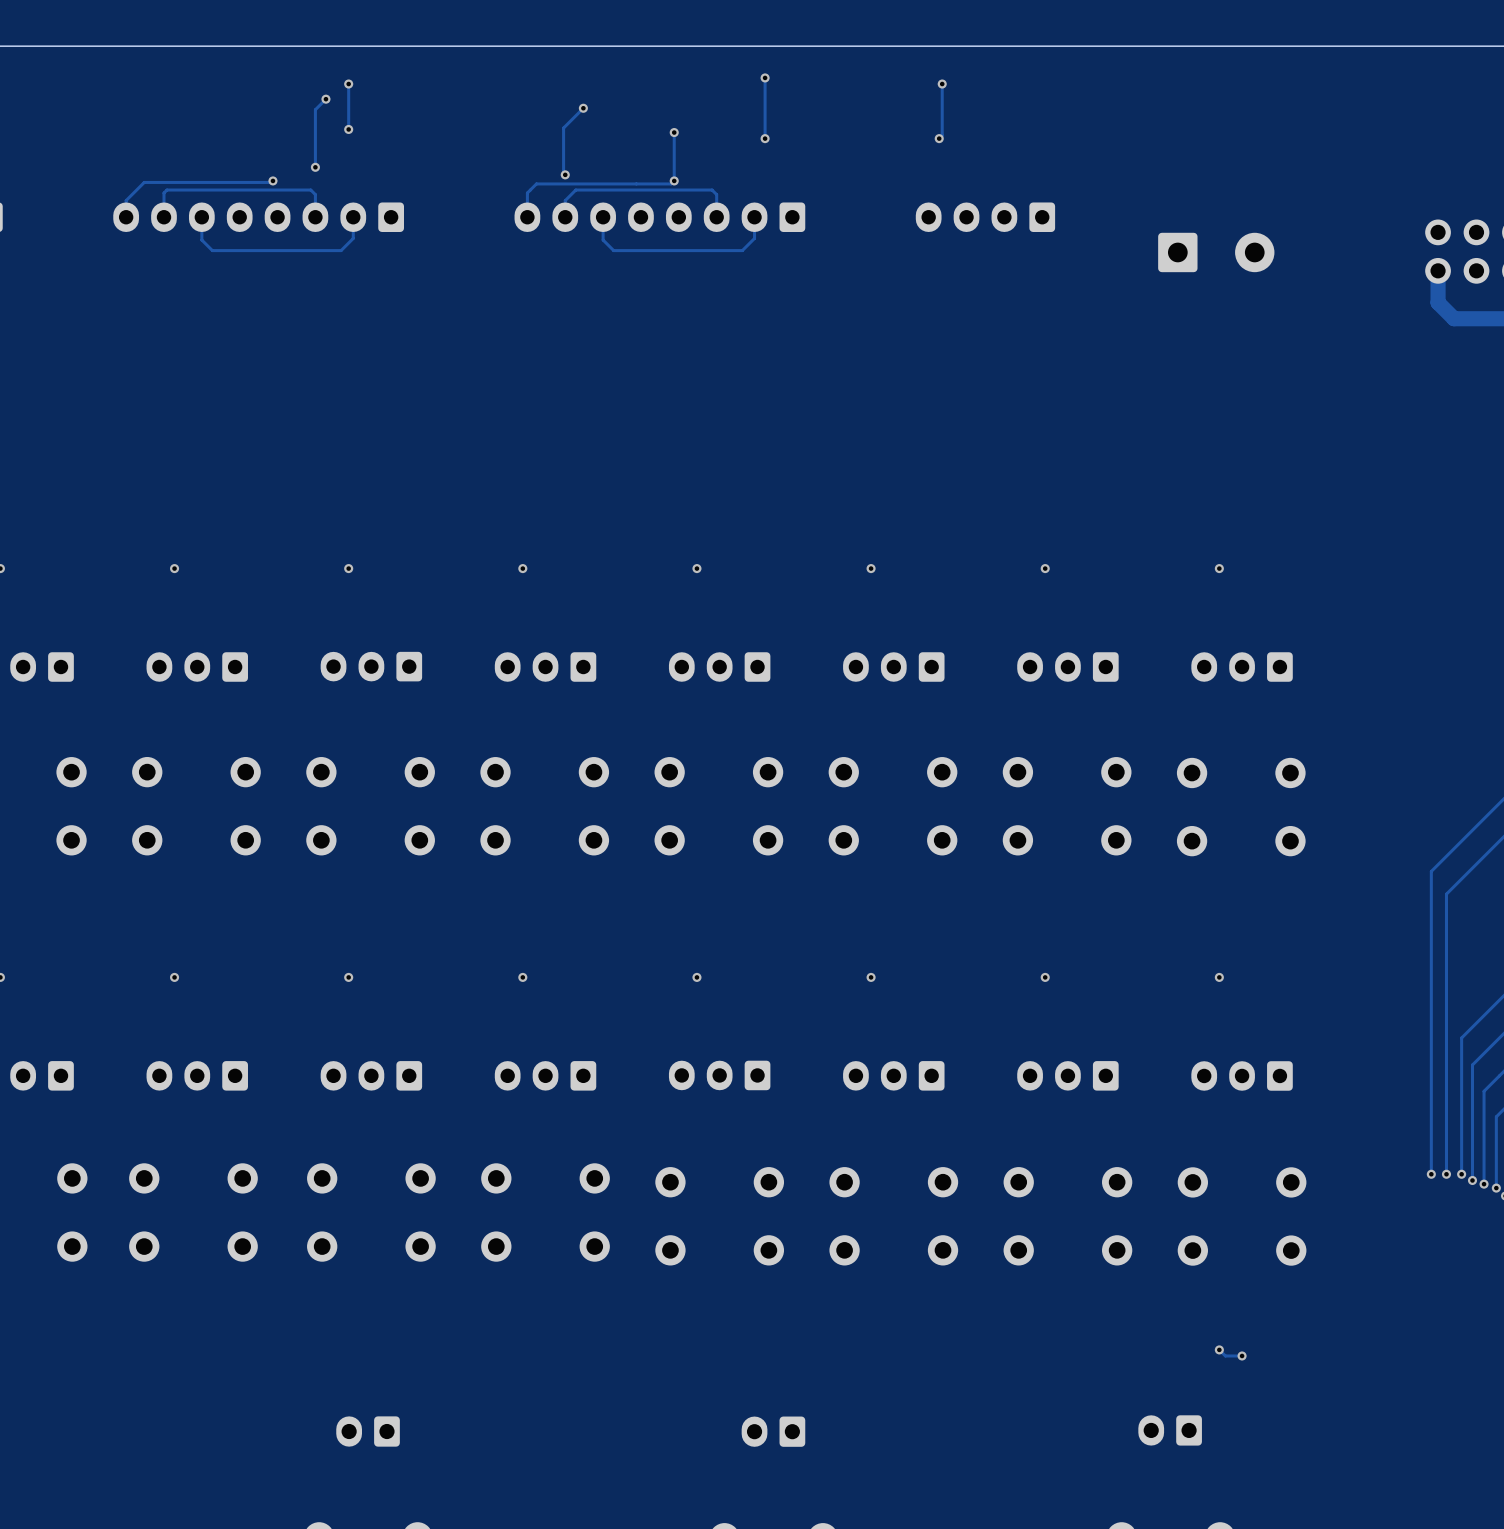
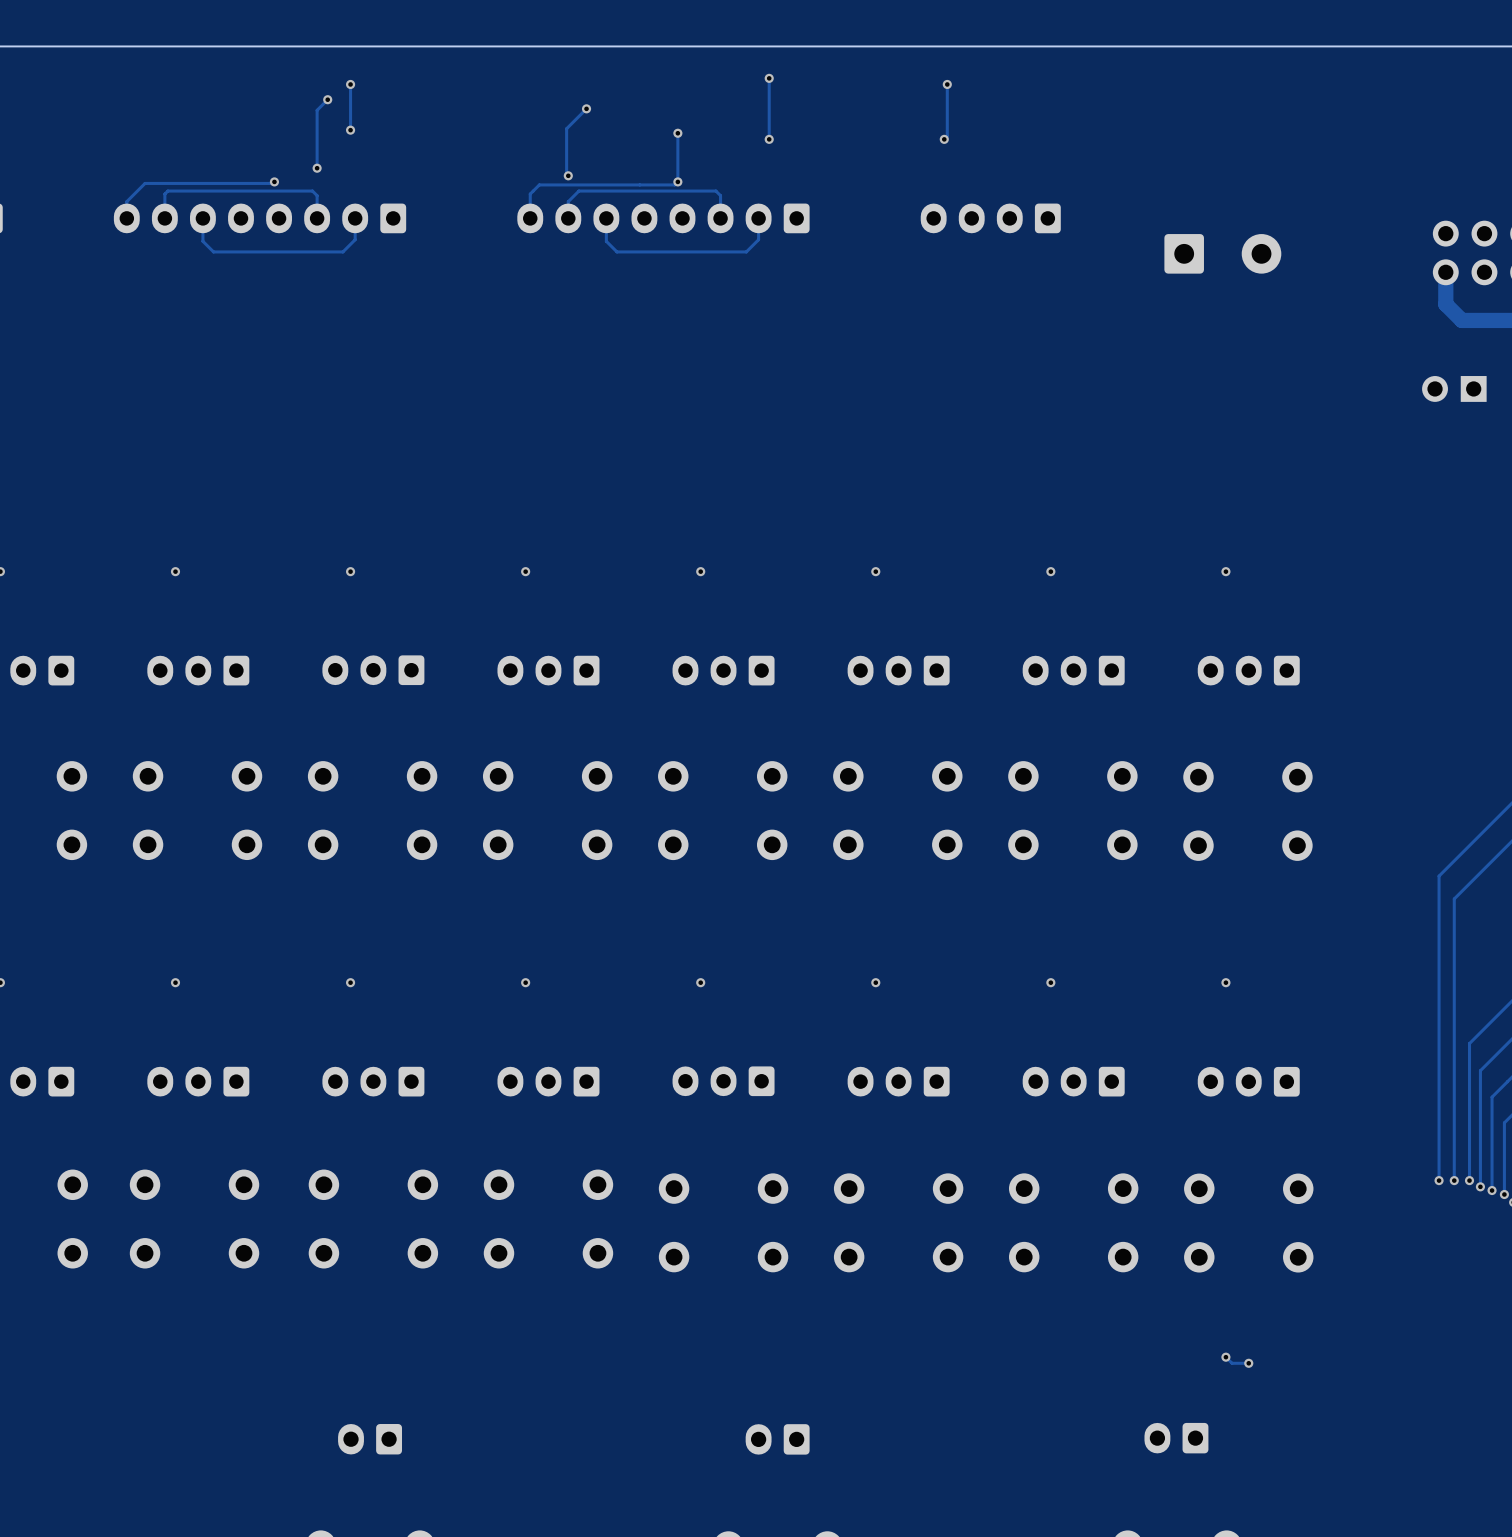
part: none -> (1454, 388)

